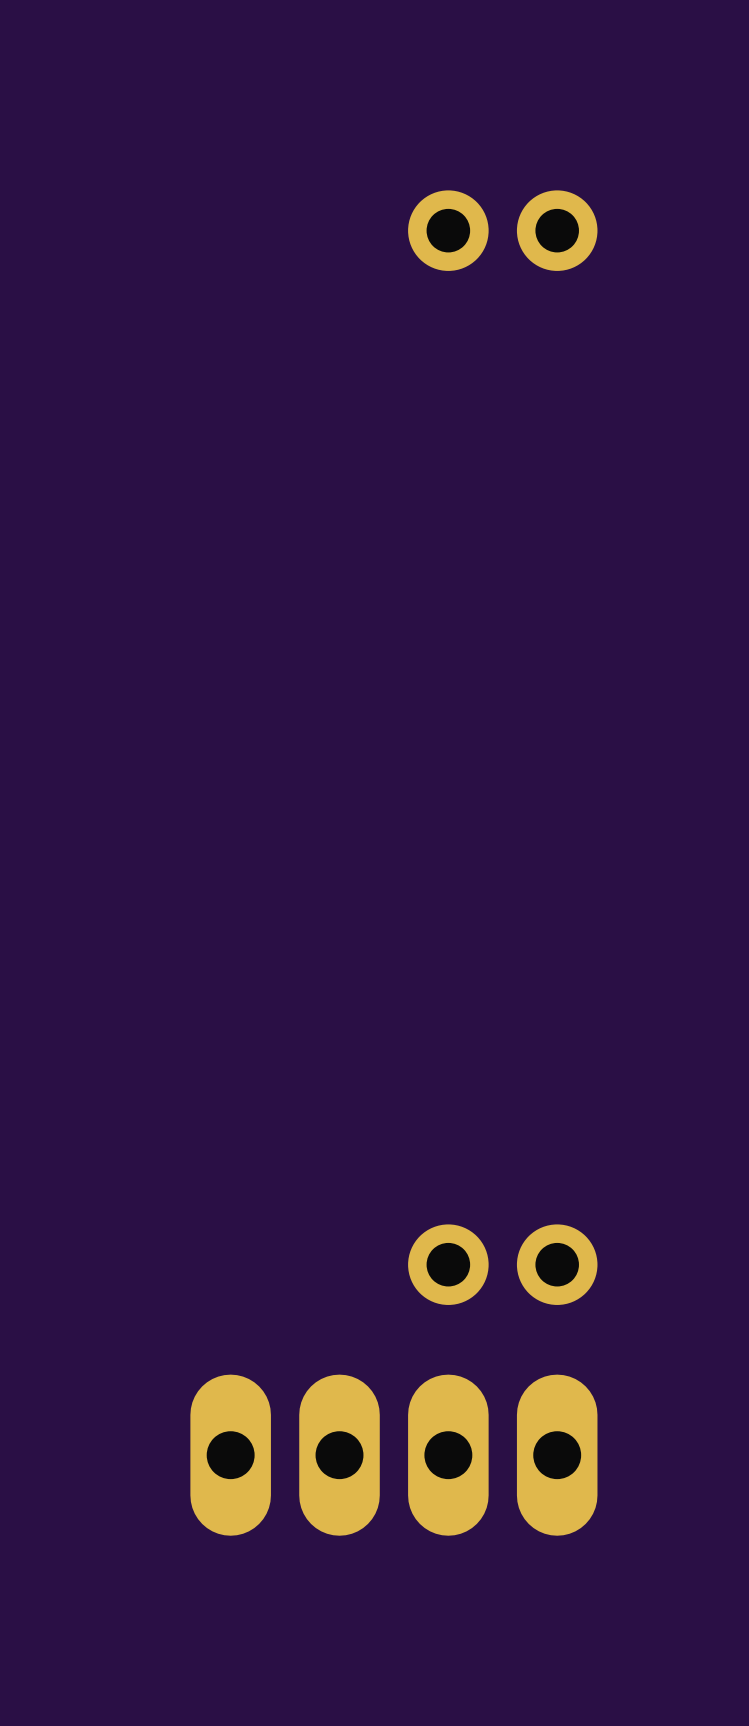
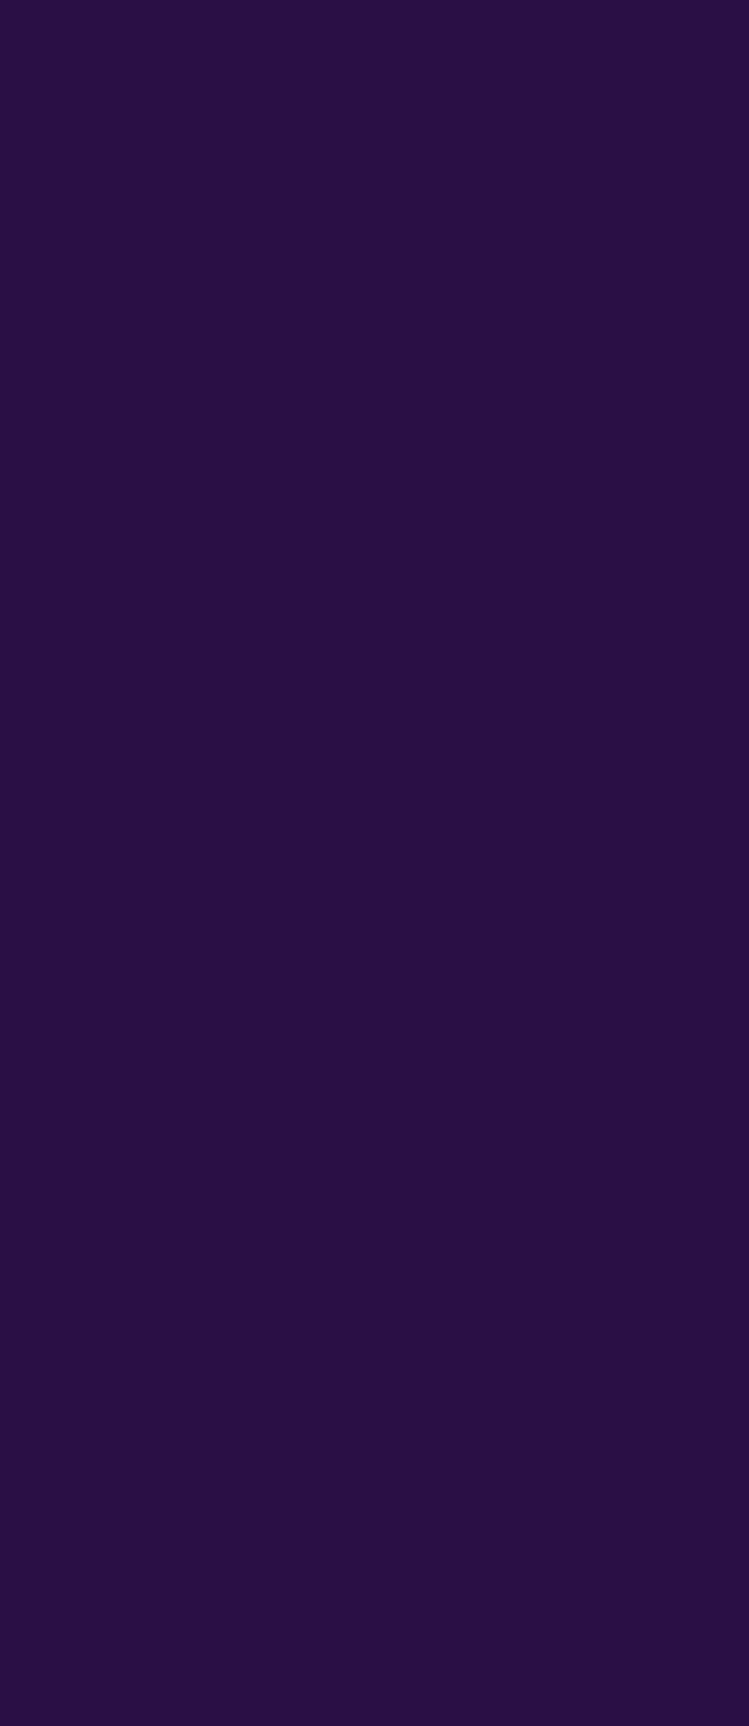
part: (502, 230) -> none
part: (502, 1264) -> none
part: (393, 1455) -> none

